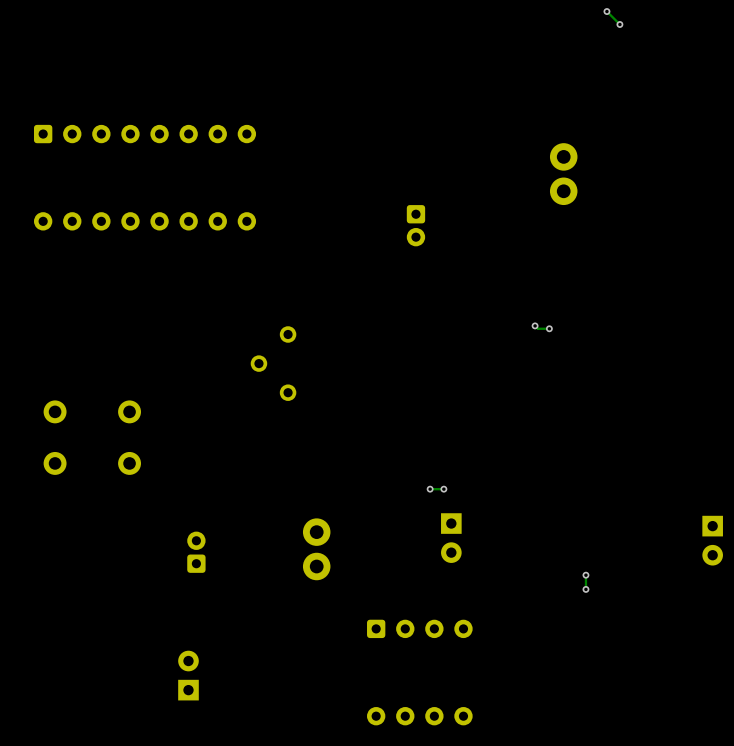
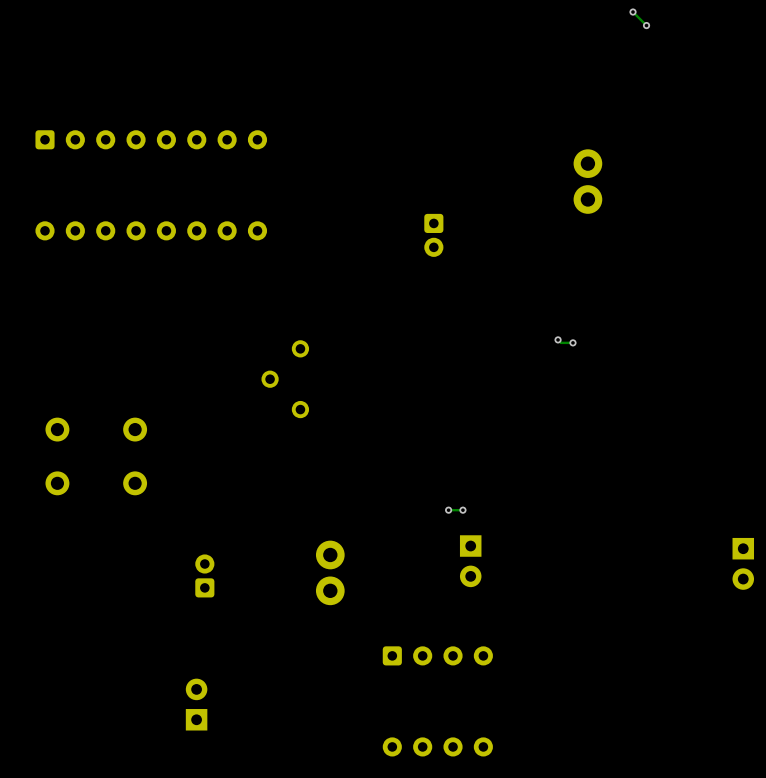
track: (585, 575) (585, 589) -> none
via: (585, 575) -> none
via: (585, 589) -> none

